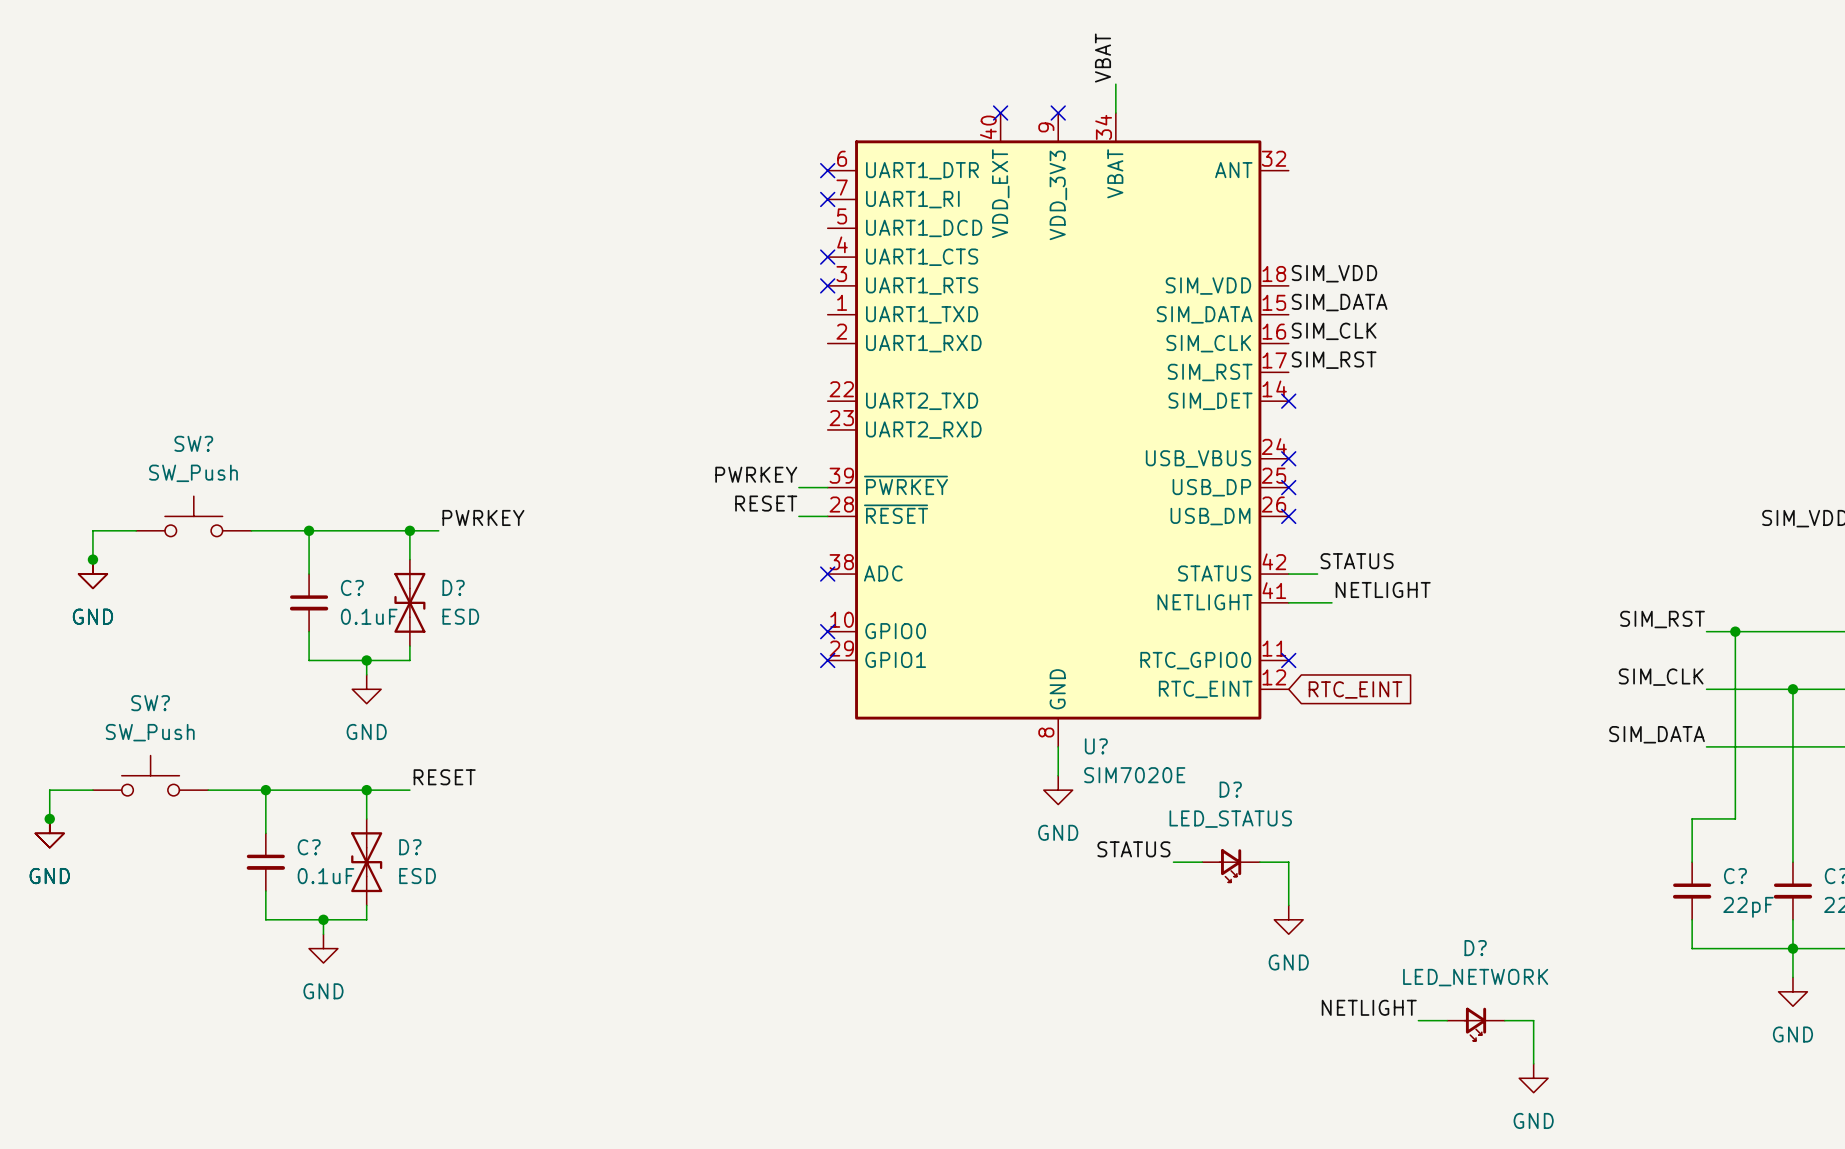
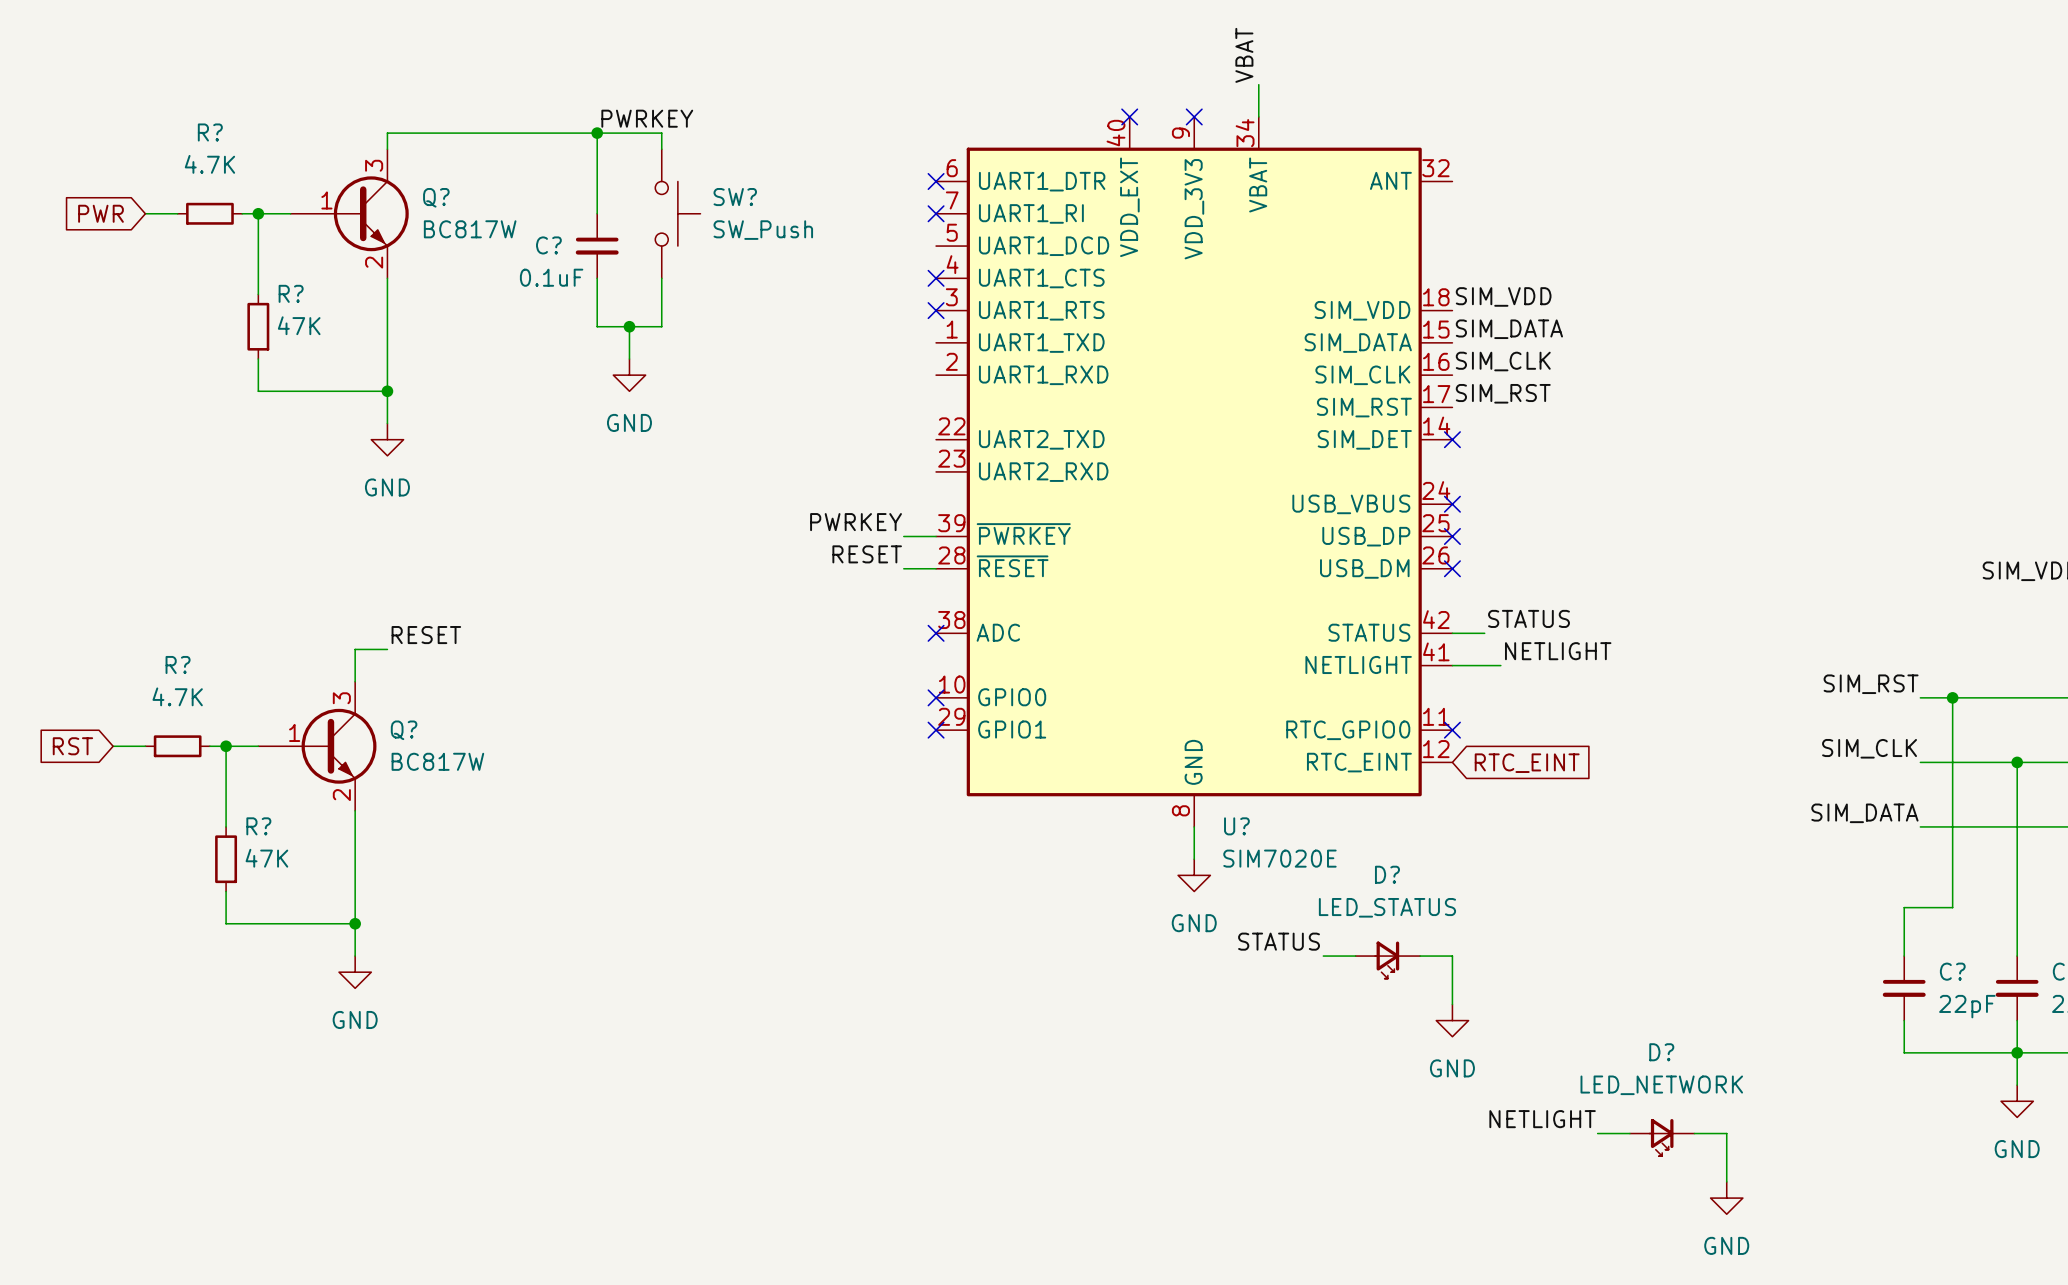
label: none -> PWRKEY (647, 118)
wire: none -> (597, 133) (597, 213)
junction: none -> (597, 133)
wire: none -> (387, 149) (387, 133) (661, 133) (661, 149)
global label: none -> PWR (100, 213)
wire: none -> (145, 213) (177, 213)
R?: none -> 4.7K (209, 213)
wire: none -> (242, 213) (290, 213)
wire: none -> (258, 213) (258, 294)
junction: none -> (258, 213)
Q?: none -> BC817W (349, 213)
SW?: none -> SW_Push (677, 213)
C?: none -> 0.1uF (597, 246)
wire: none -> (387, 278) (387, 423)
wire: none -> (597, 278) (597, 326) (661, 326) (661, 278)
R?: none -> 47K (258, 326)
junction: none -> (629, 326)
wire: none -> (258, 359) (258, 391) (387, 391)
power symbol: none -> GND (629, 375)
junction: none -> (387, 391)
power symbol: none -> GND (387, 439)
SW?: SW_Push (193, 516) -> none
label: PWRKEY (483, 517) -> none
wire: (136, 530) (92, 530) (92, 559) -> none
wire: (251, 530) (438, 530) -> none
wire: (309, 530) (309, 574) -> none
junction: (309, 530) -> none
wire: (409, 530) (409, 559) -> (629, 326) (629, 359)
junction: (409, 530) -> none
junction: (92, 559) -> none
power symbol: GND (92, 574) -> none
wire: none -> (387, 649) (355, 649) (355, 681)
C?: 0.1uF (309, 602) -> none
D?: ESD (409, 602) -> none
wire: (309, 631) (309, 660) (409, 660) (409, 646) -> none
wire: (366, 660) (366, 674) -> none
junction: (366, 660) -> none
global label: none -> RST (72, 746)
wire: none -> (113, 746) (145, 746)
R?: none -> 4.7K (177, 746)
wire: none -> (209, 746) (258, 746)
wire: none -> (226, 746) (226, 826)
junction: none -> (226, 746)
Q?: none -> BC817W (317, 746)
power symbol: GND (366, 689) -> none
wire: none -> (355, 810) (355, 956)
SW?: SW_Push (150, 775) -> none
R?: none -> 47K (226, 859)
label position: RESET (444, 777) -> RESET (426, 635)
wire: (92, 790) (49, 790) (49, 818) -> none
wire: (208, 790) (409, 790) -> none
wire: (265, 790) (265, 833) -> none
junction: (265, 790) -> none
wire: (366, 790) (366, 818) -> none
junction: (366, 790) -> none
wire: none -> (226, 891) (226, 923) (355, 923)
junction: (49, 818) -> none
power symbol: GND (49, 833) -> none
junction: none -> (355, 923)
C?: 0.1uF (265, 862) -> none
D?: ESD (366, 862) -> none
wire: (265, 890) (265, 919) (366, 919) (366, 905) -> none
wire: (323, 919) (323, 934) -> none
junction: (323, 919) -> none
power symbol position: GND (323, 948) -> GND (355, 972)

